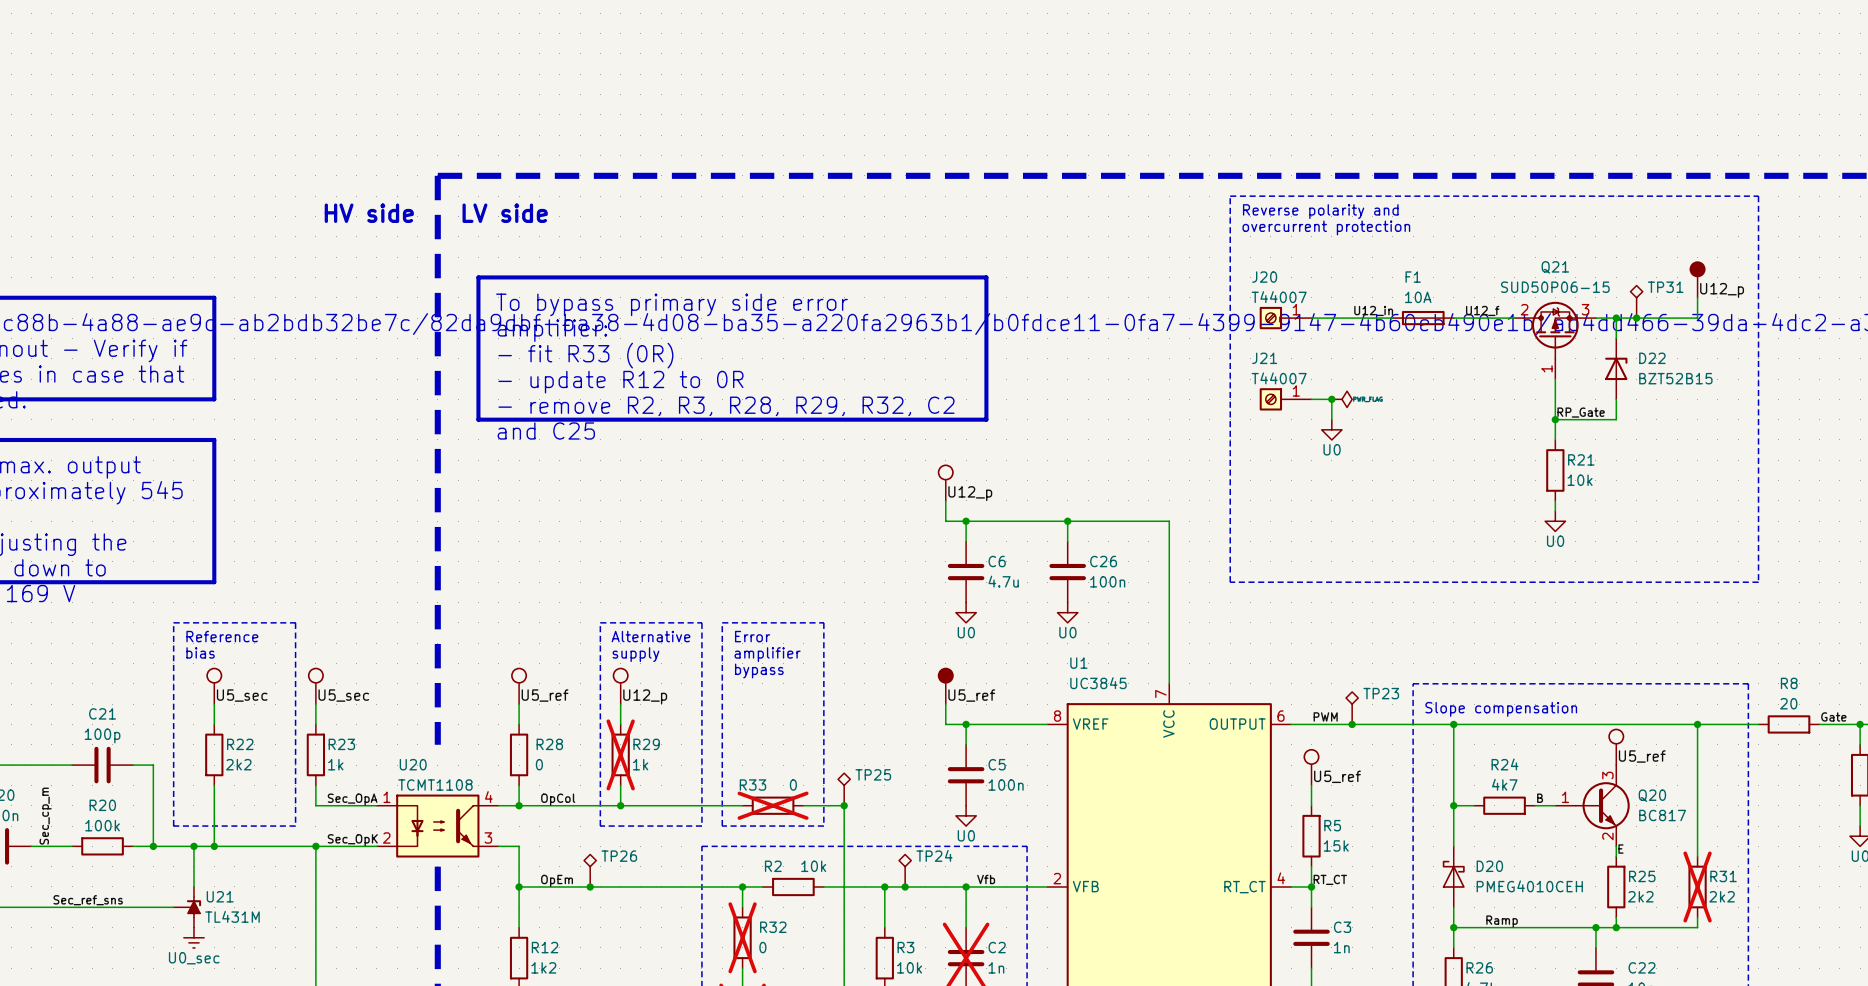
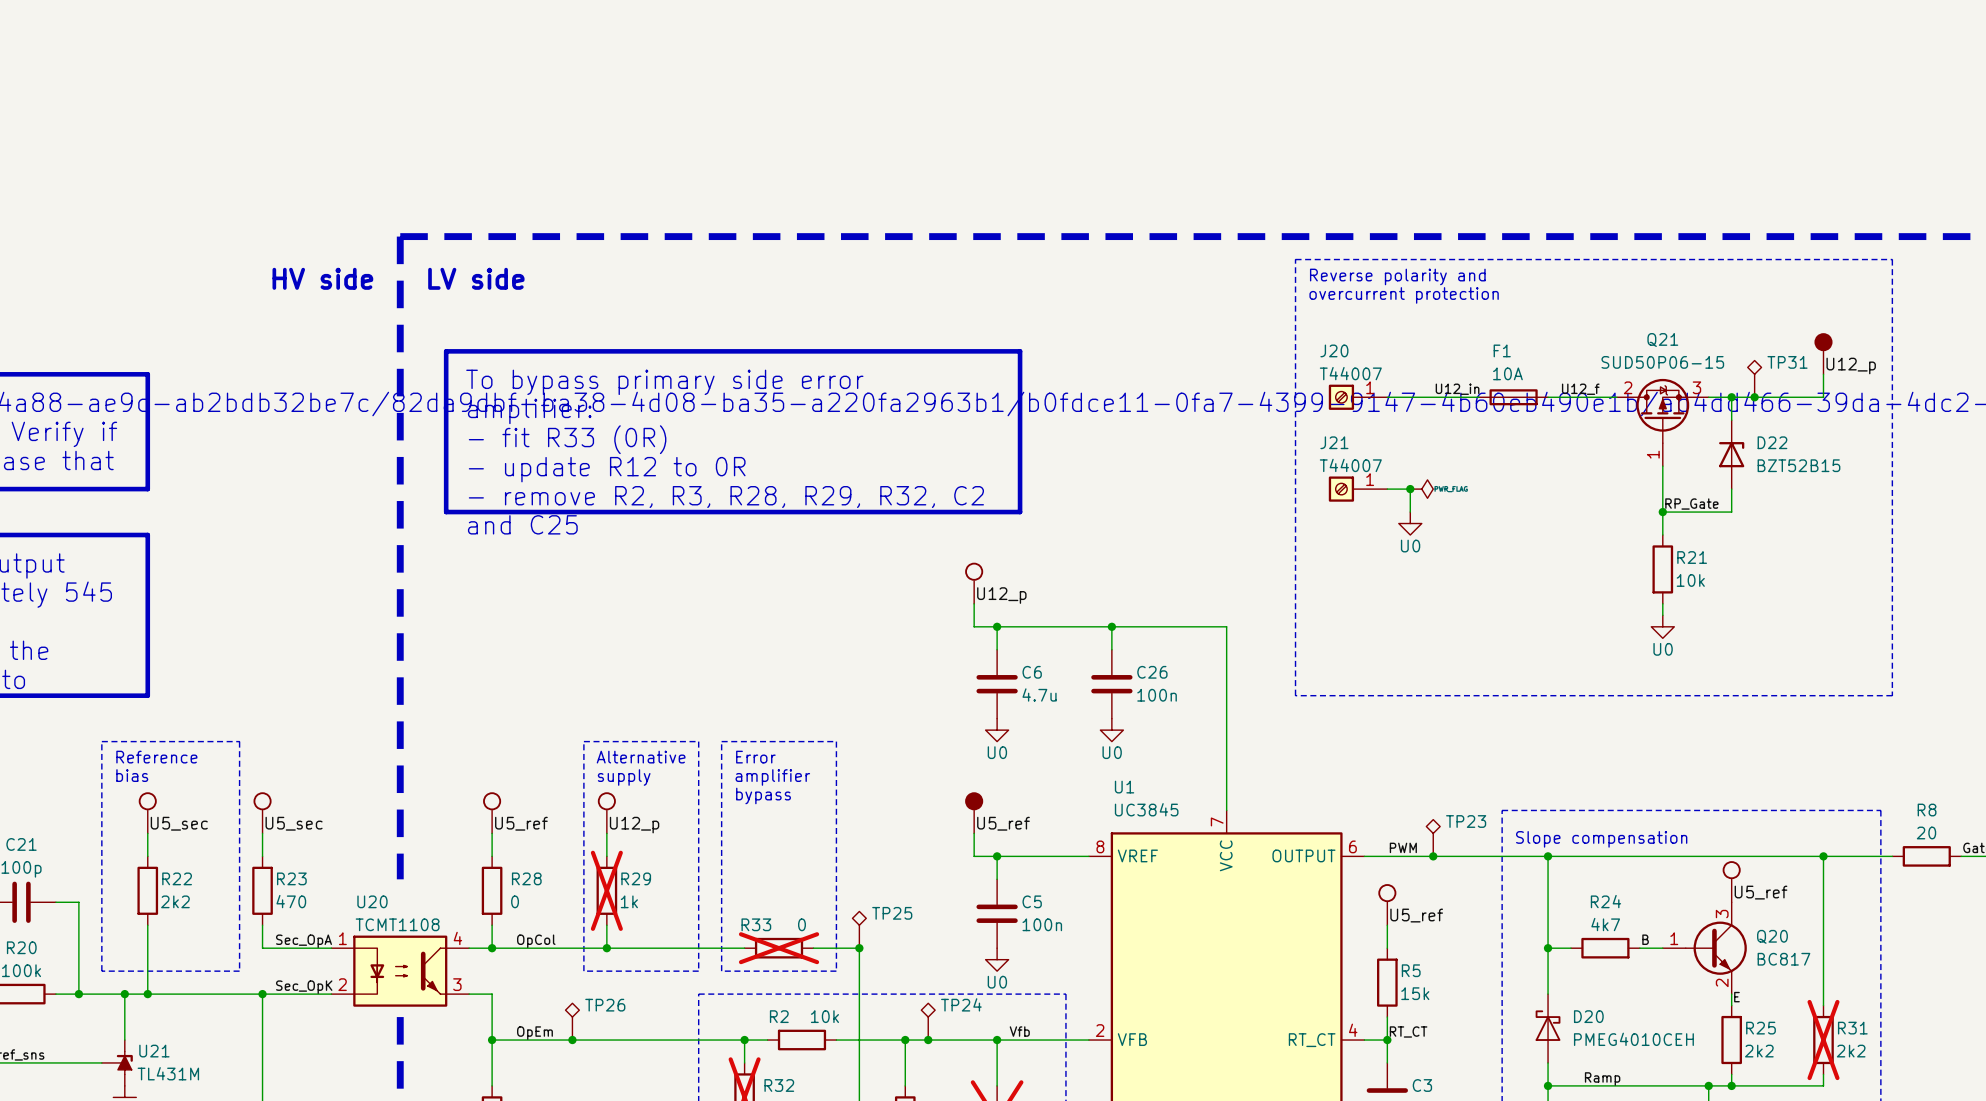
R23 value: 1k (335, 764) -> 470 (291, 901)

